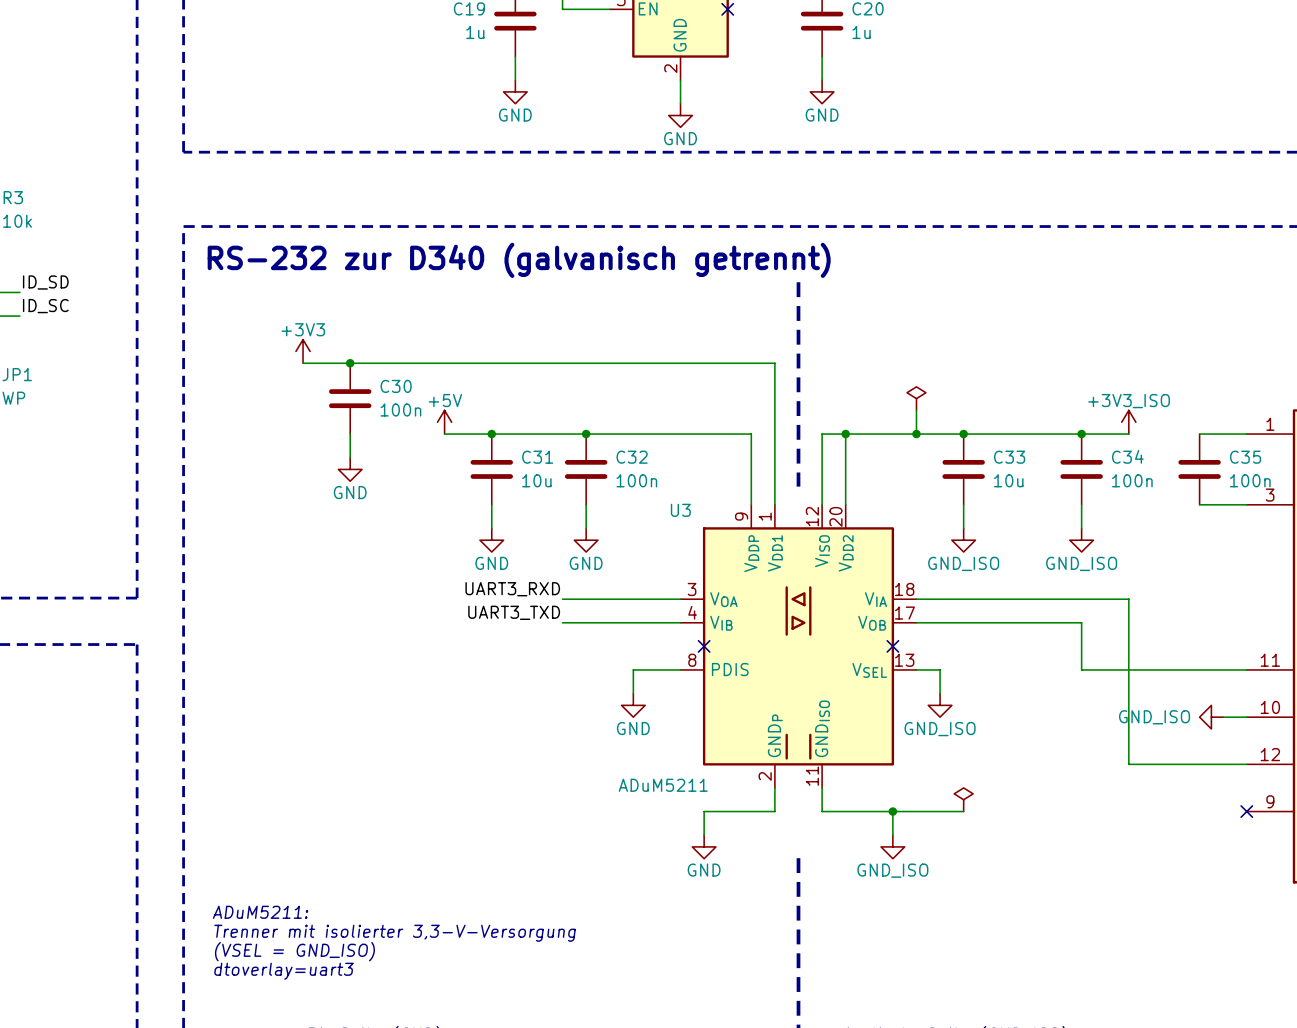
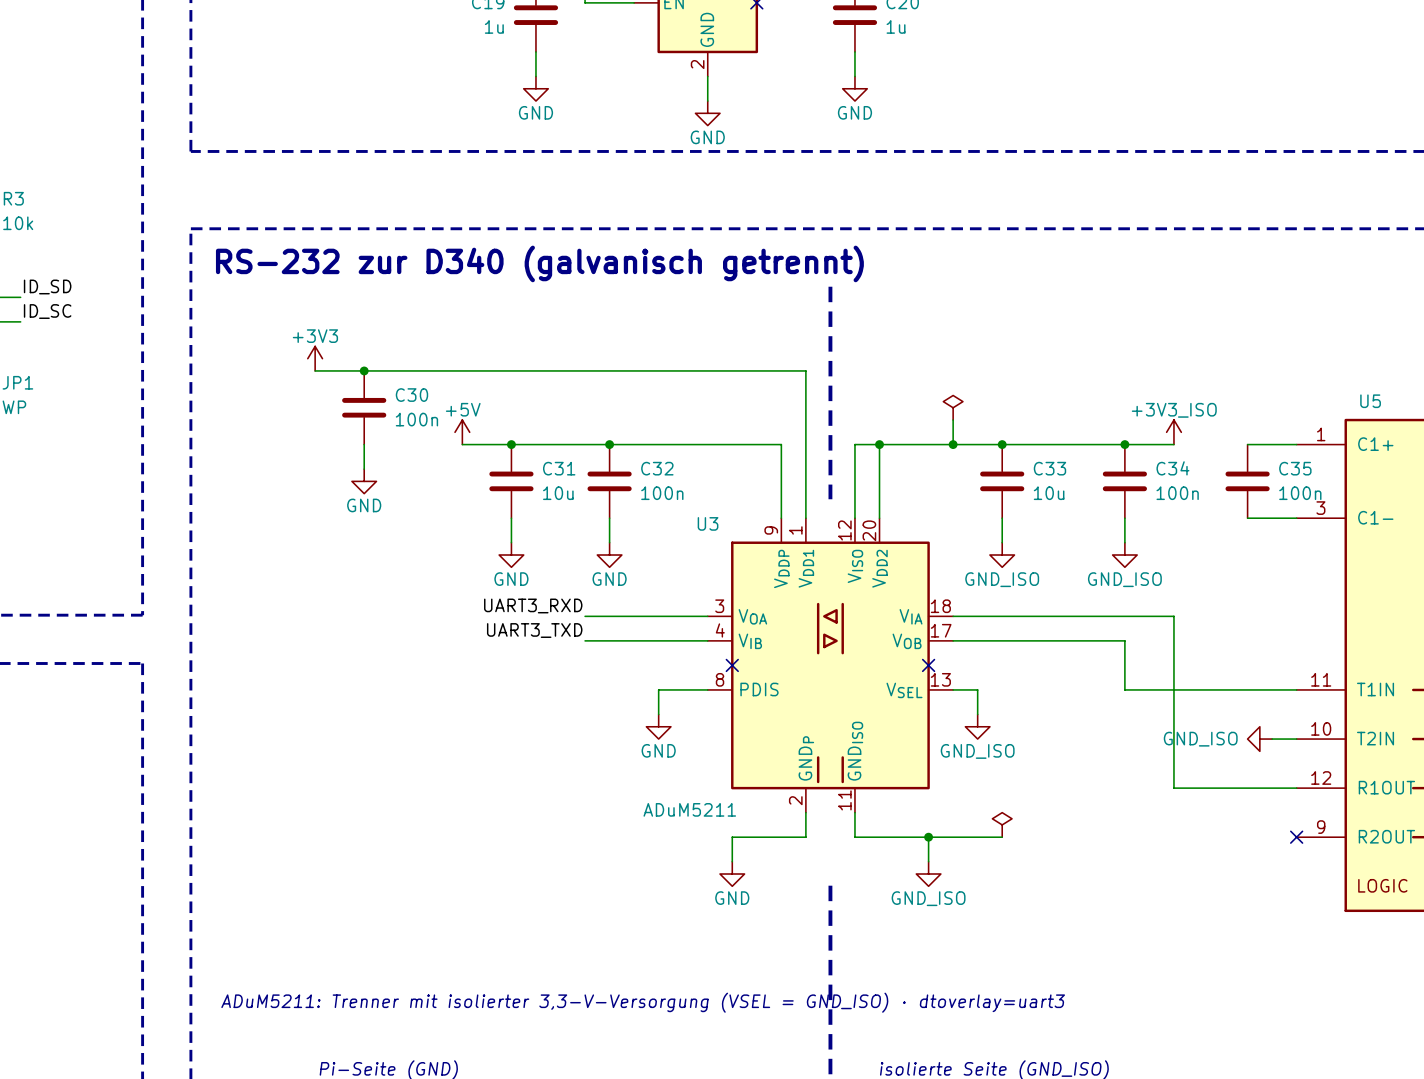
text: ADuM5211: (260, 912) -> none
text: Trenner mit isolierter 3,3-V-Versorgung (395, 933) -> none
text: (VSEL = GND_ISO) (294, 951) -> none
text: dtoverlay=uart3 (284, 971) -> ADuM5211: Trenner mit isolierter 3,3-V-Versorgung (VSEL = GND_ISO) · dtoverlay=uart3 (643, 1002)

